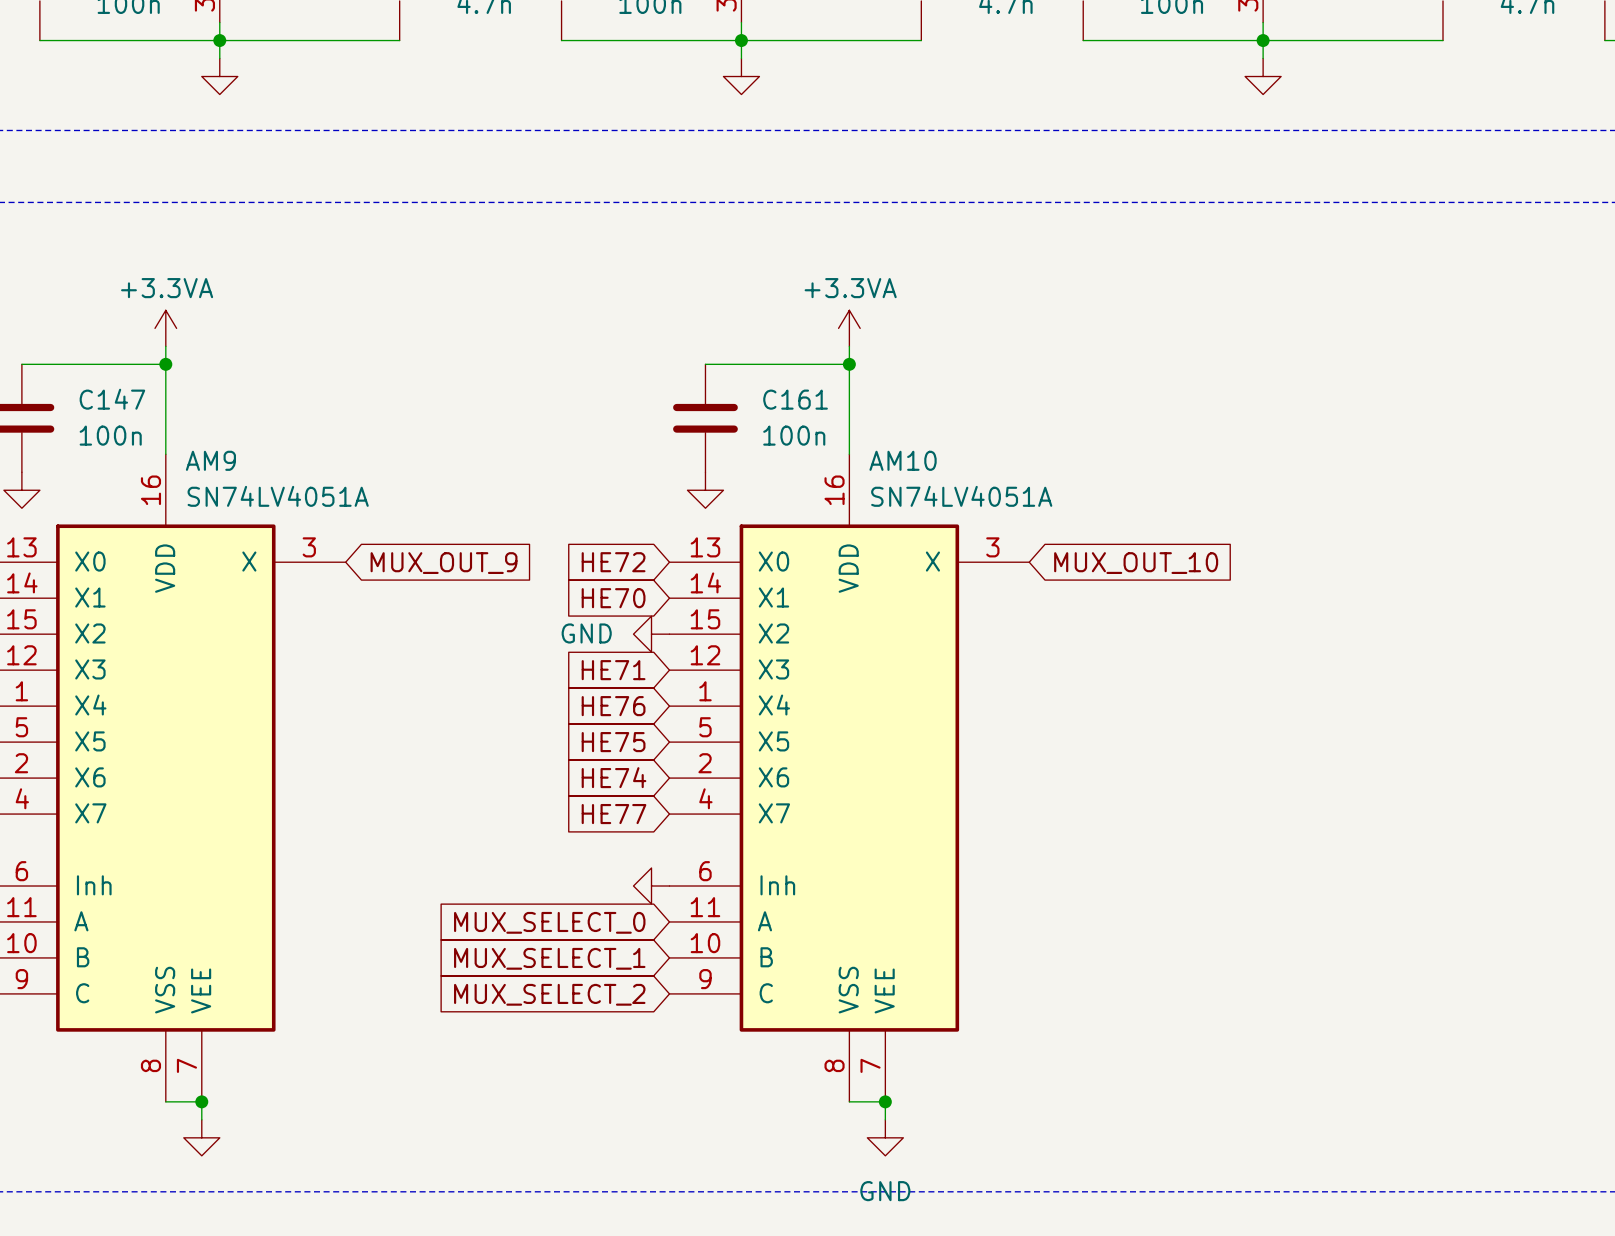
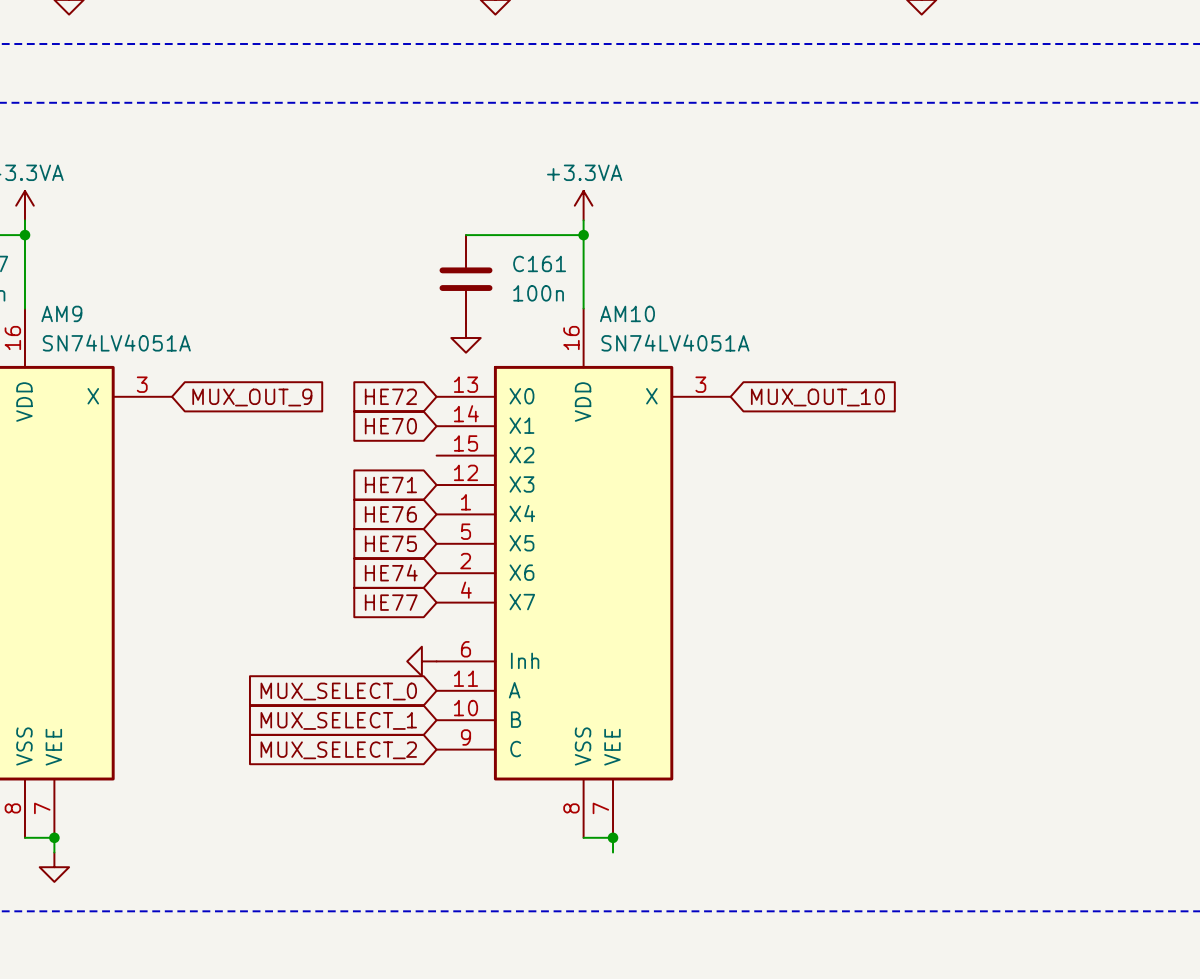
power symbol: GND (651, 634) -> none
power symbol: GND (885, 1137) -> none

